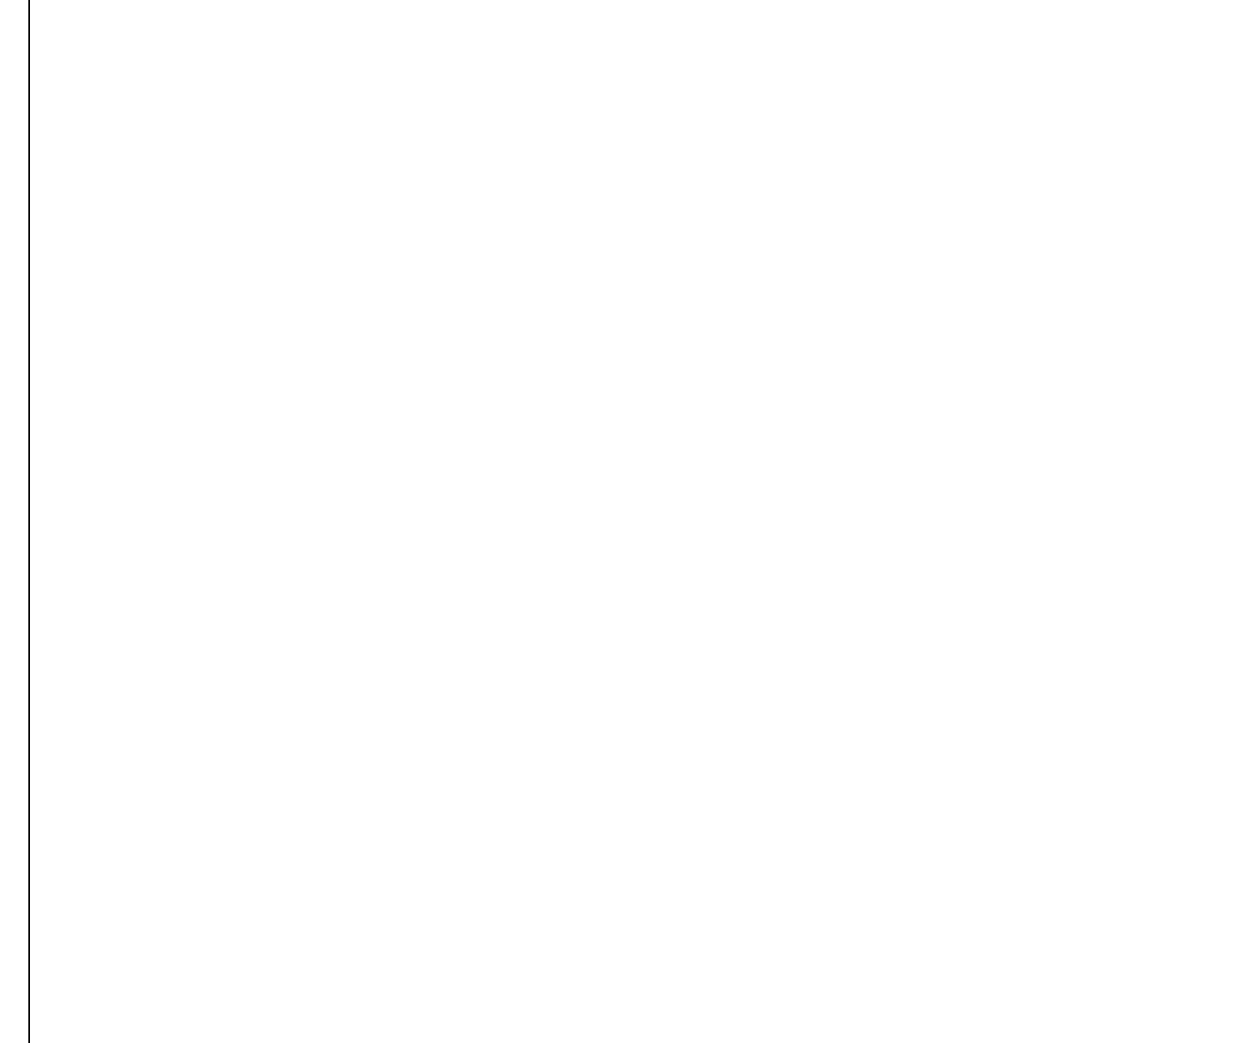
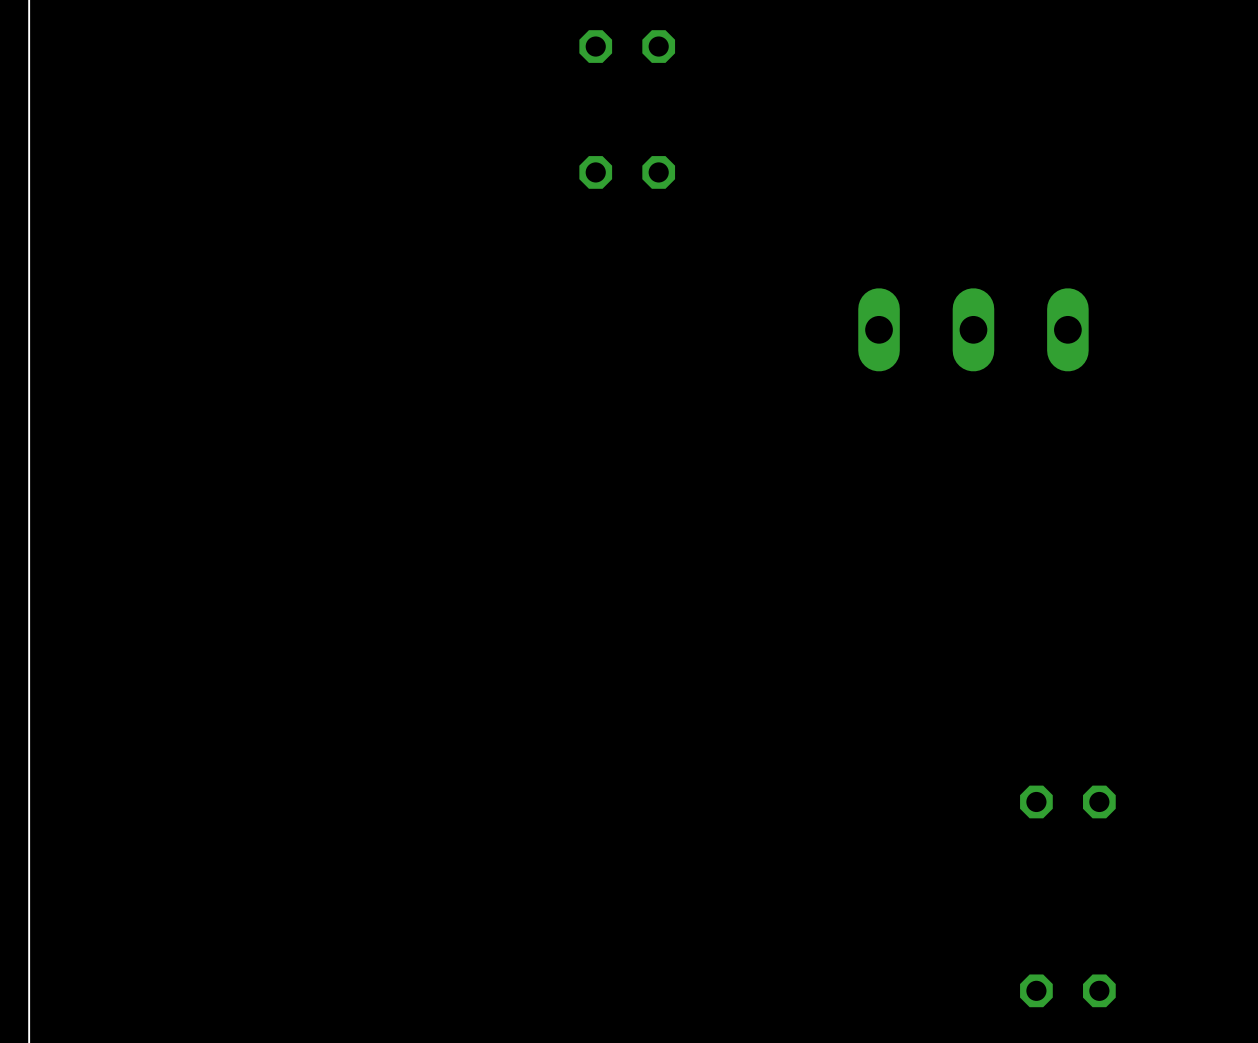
part: none -> (627, 46)
part: none -> (627, 172)
part: none -> (973, 329)
part: none -> (1067, 801)
part: none -> (1067, 990)

